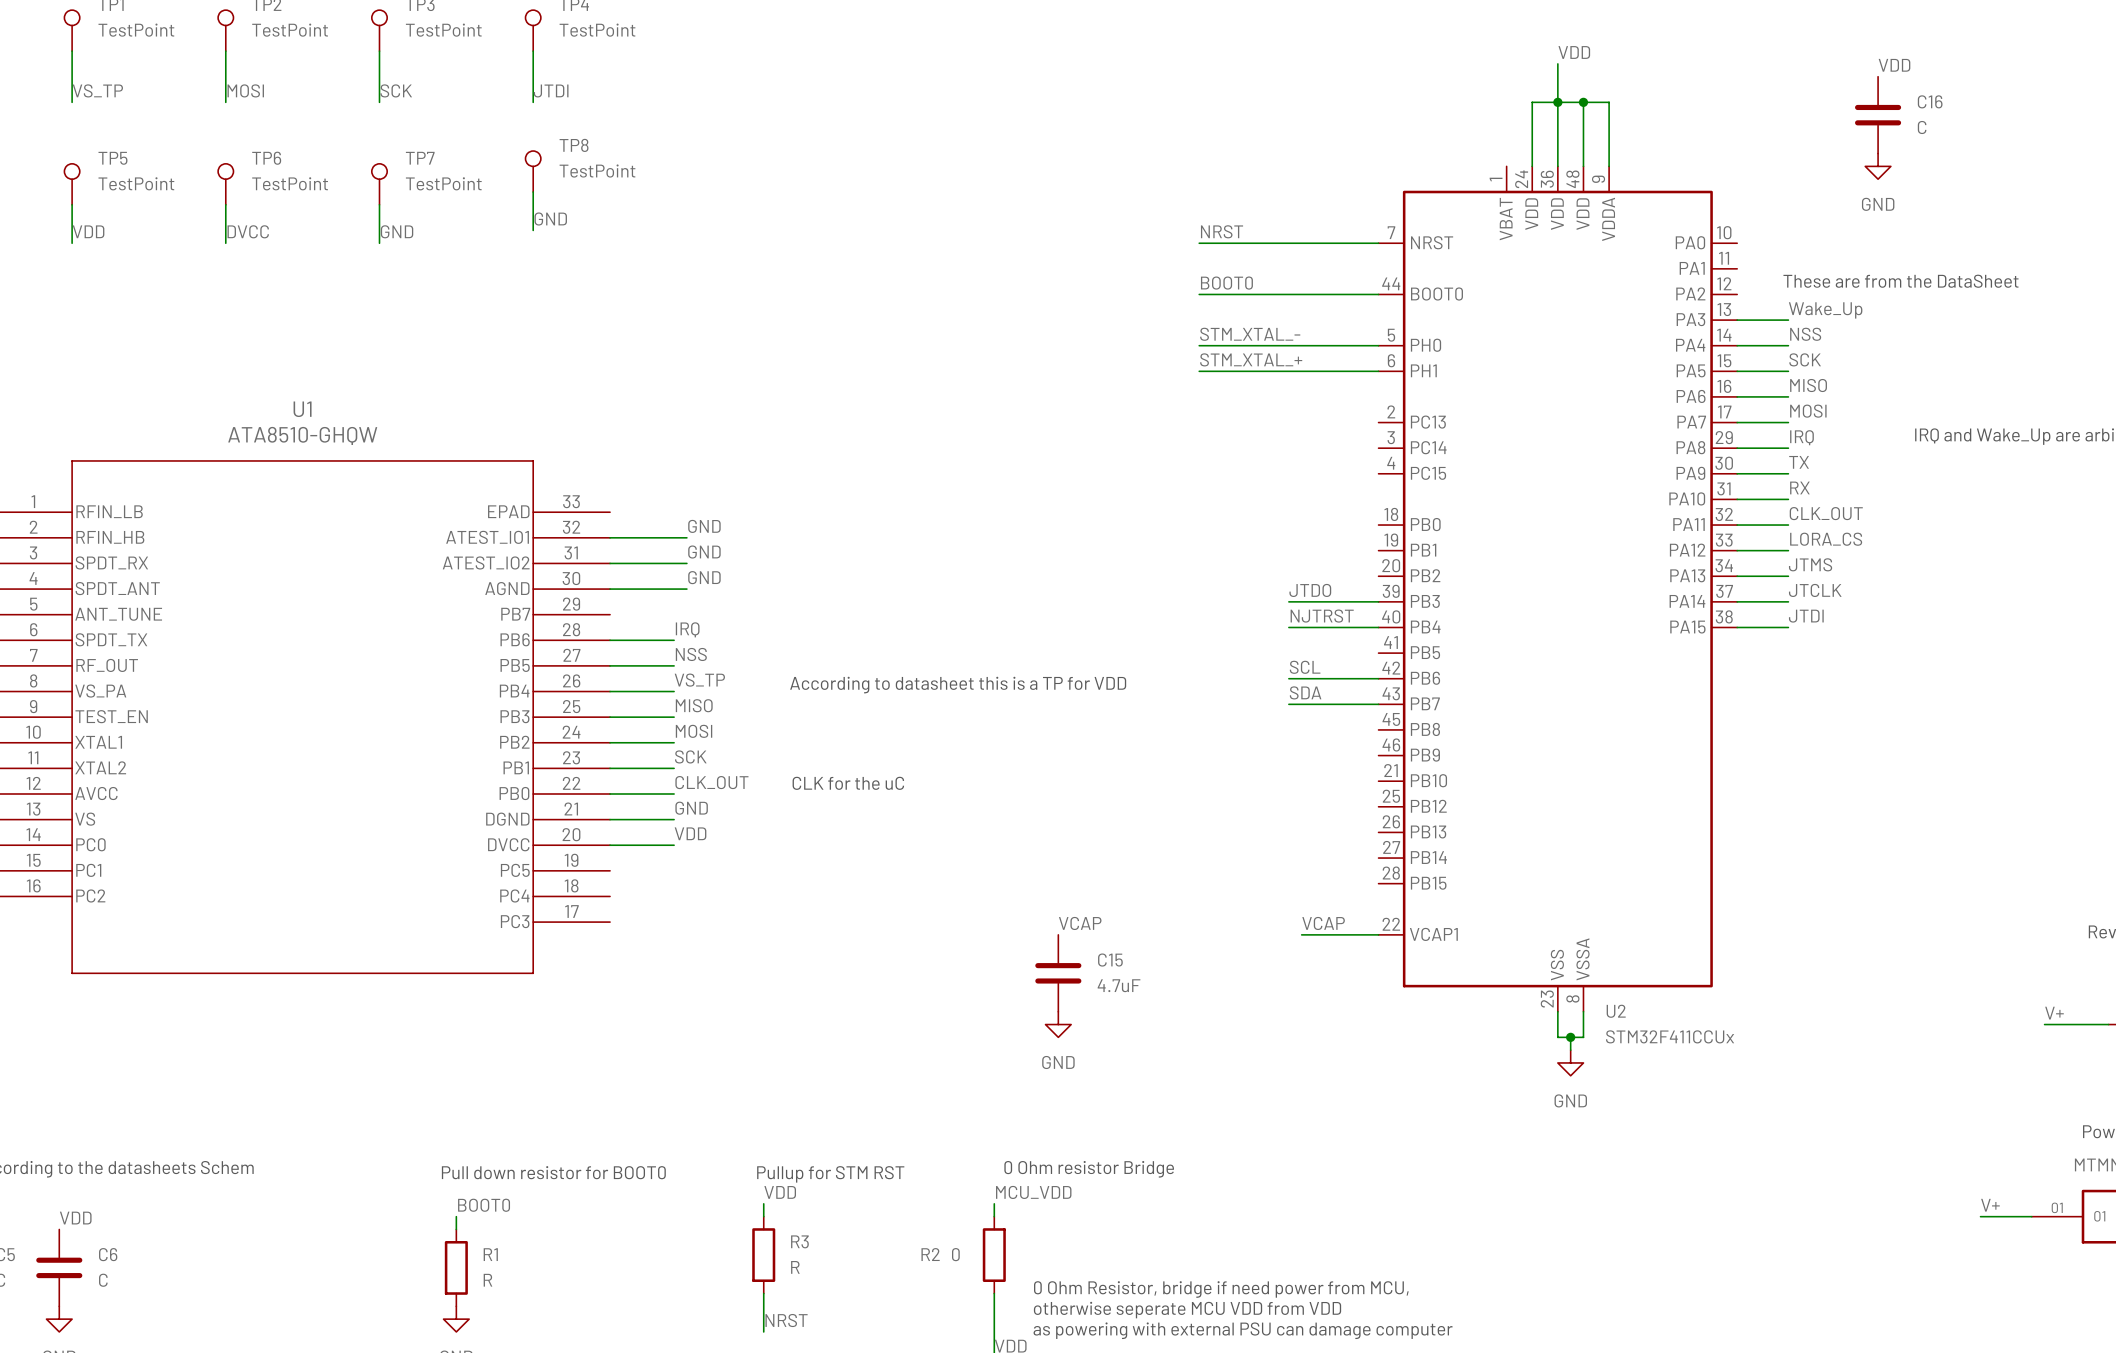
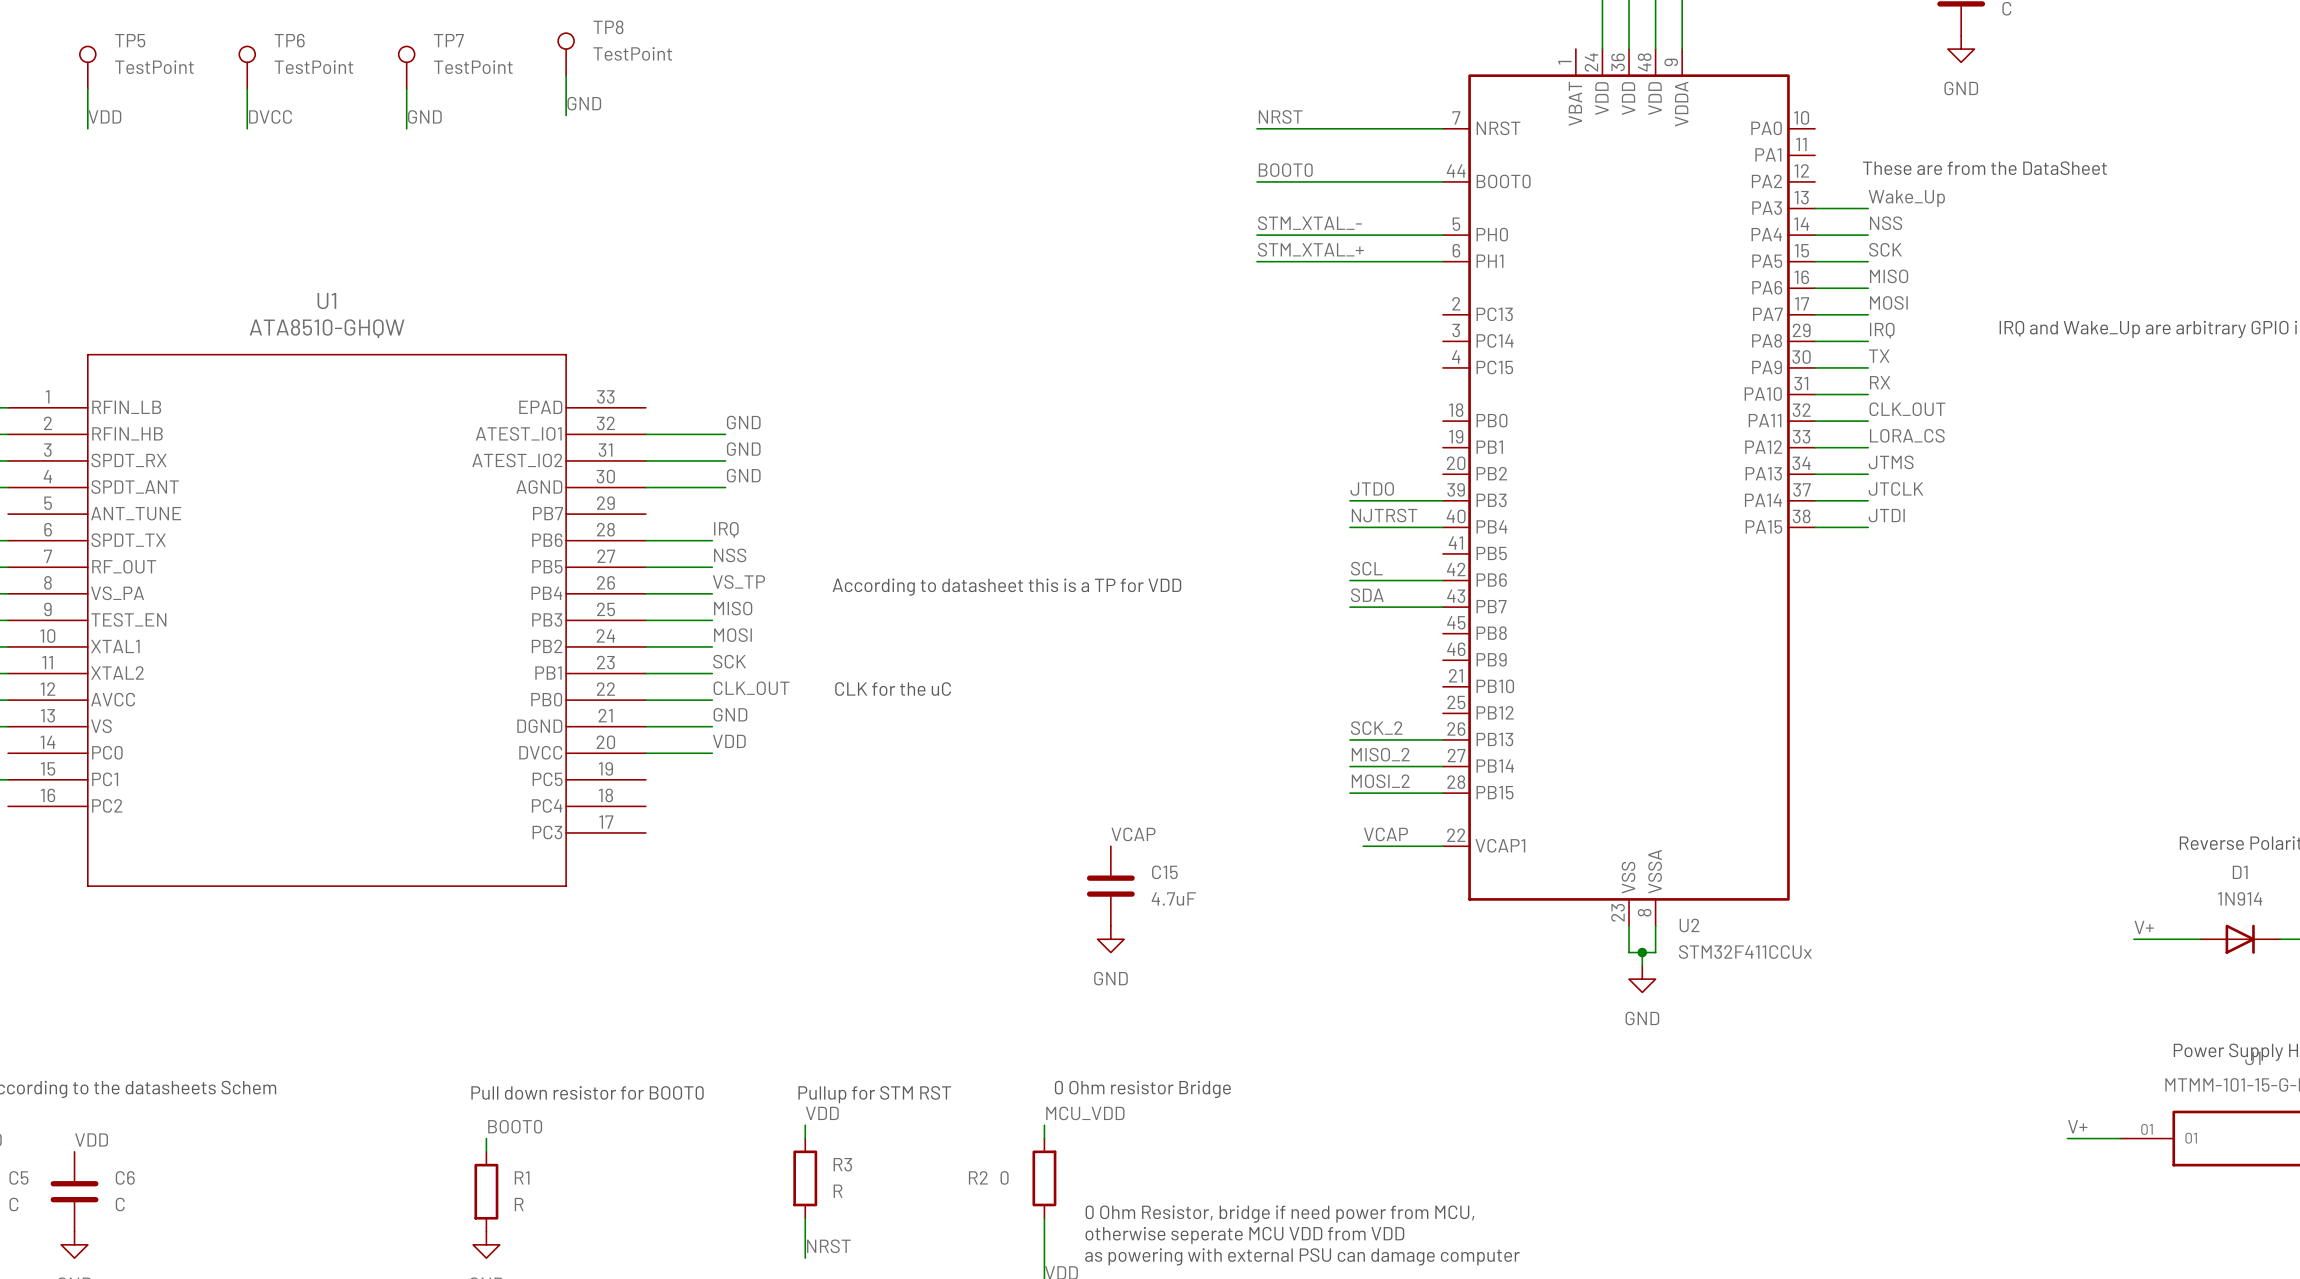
label: none -> SCK_2 (1376, 728)
wire: none -> (1350, 739) (1443, 739)
label: none -> MISO_2 (1380, 754)
wire: none -> (1350, 766) (1443, 766)
label: none -> MOSI_2 (1380, 781)
wire: none -> (1350, 793) (1443, 793)

